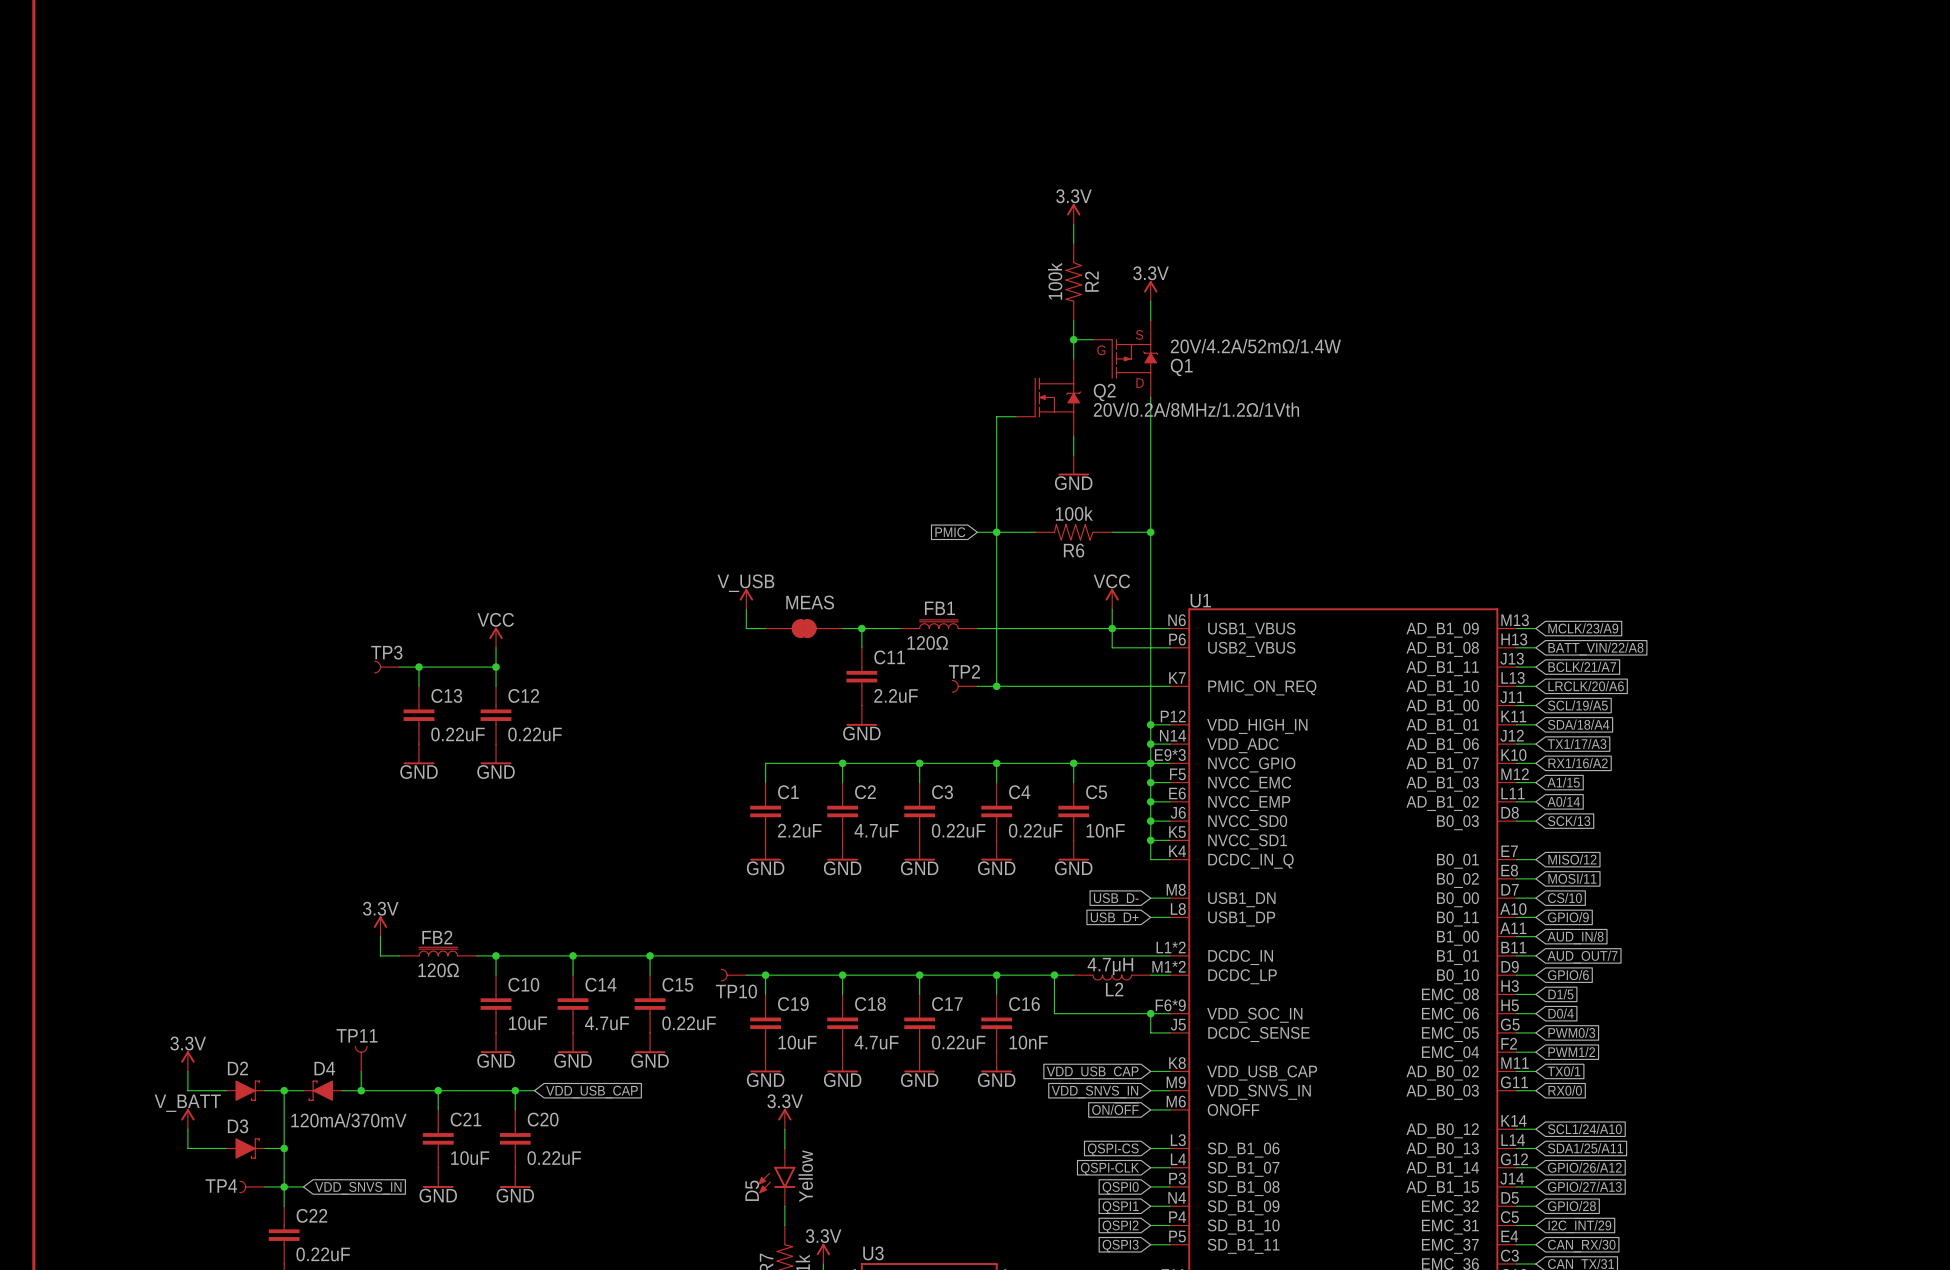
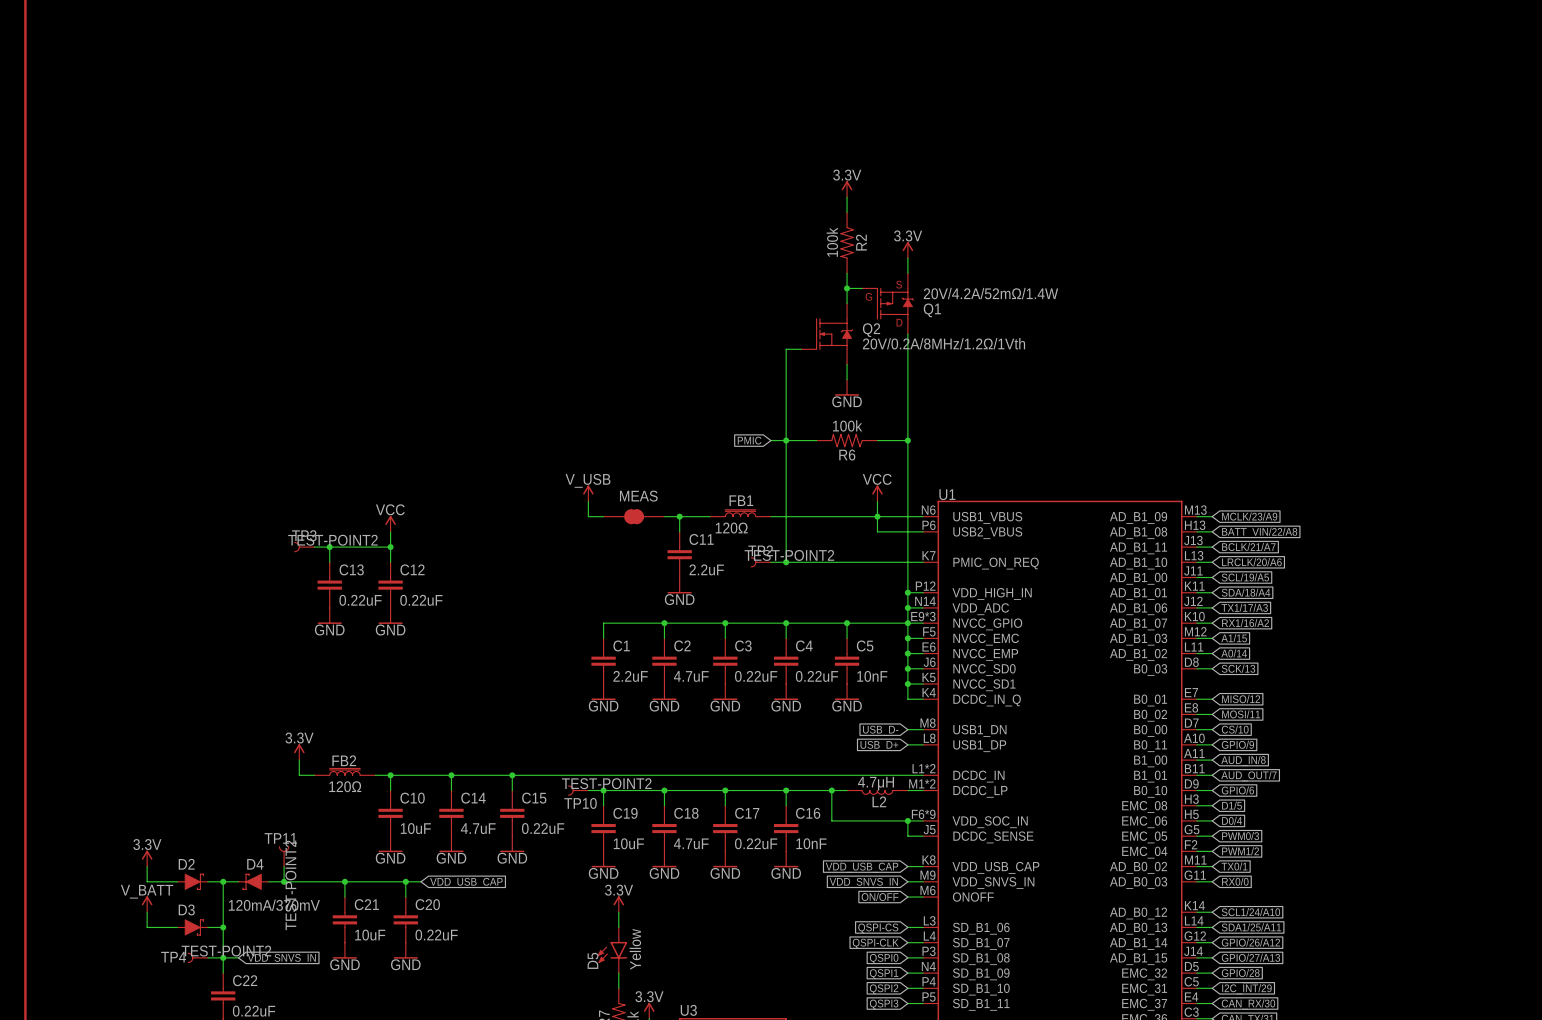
TP3 value: none -> TEST-POINT2 (332, 540)
TP2 value: none -> TEST-POINT2 (789, 555)
TP10 value: none -> TEST-POINT2 (606, 783)
TP11 value: none -> TEST-POINT2 (290, 885)
TP4 value: none -> TEST-POINT2 (226, 951)

